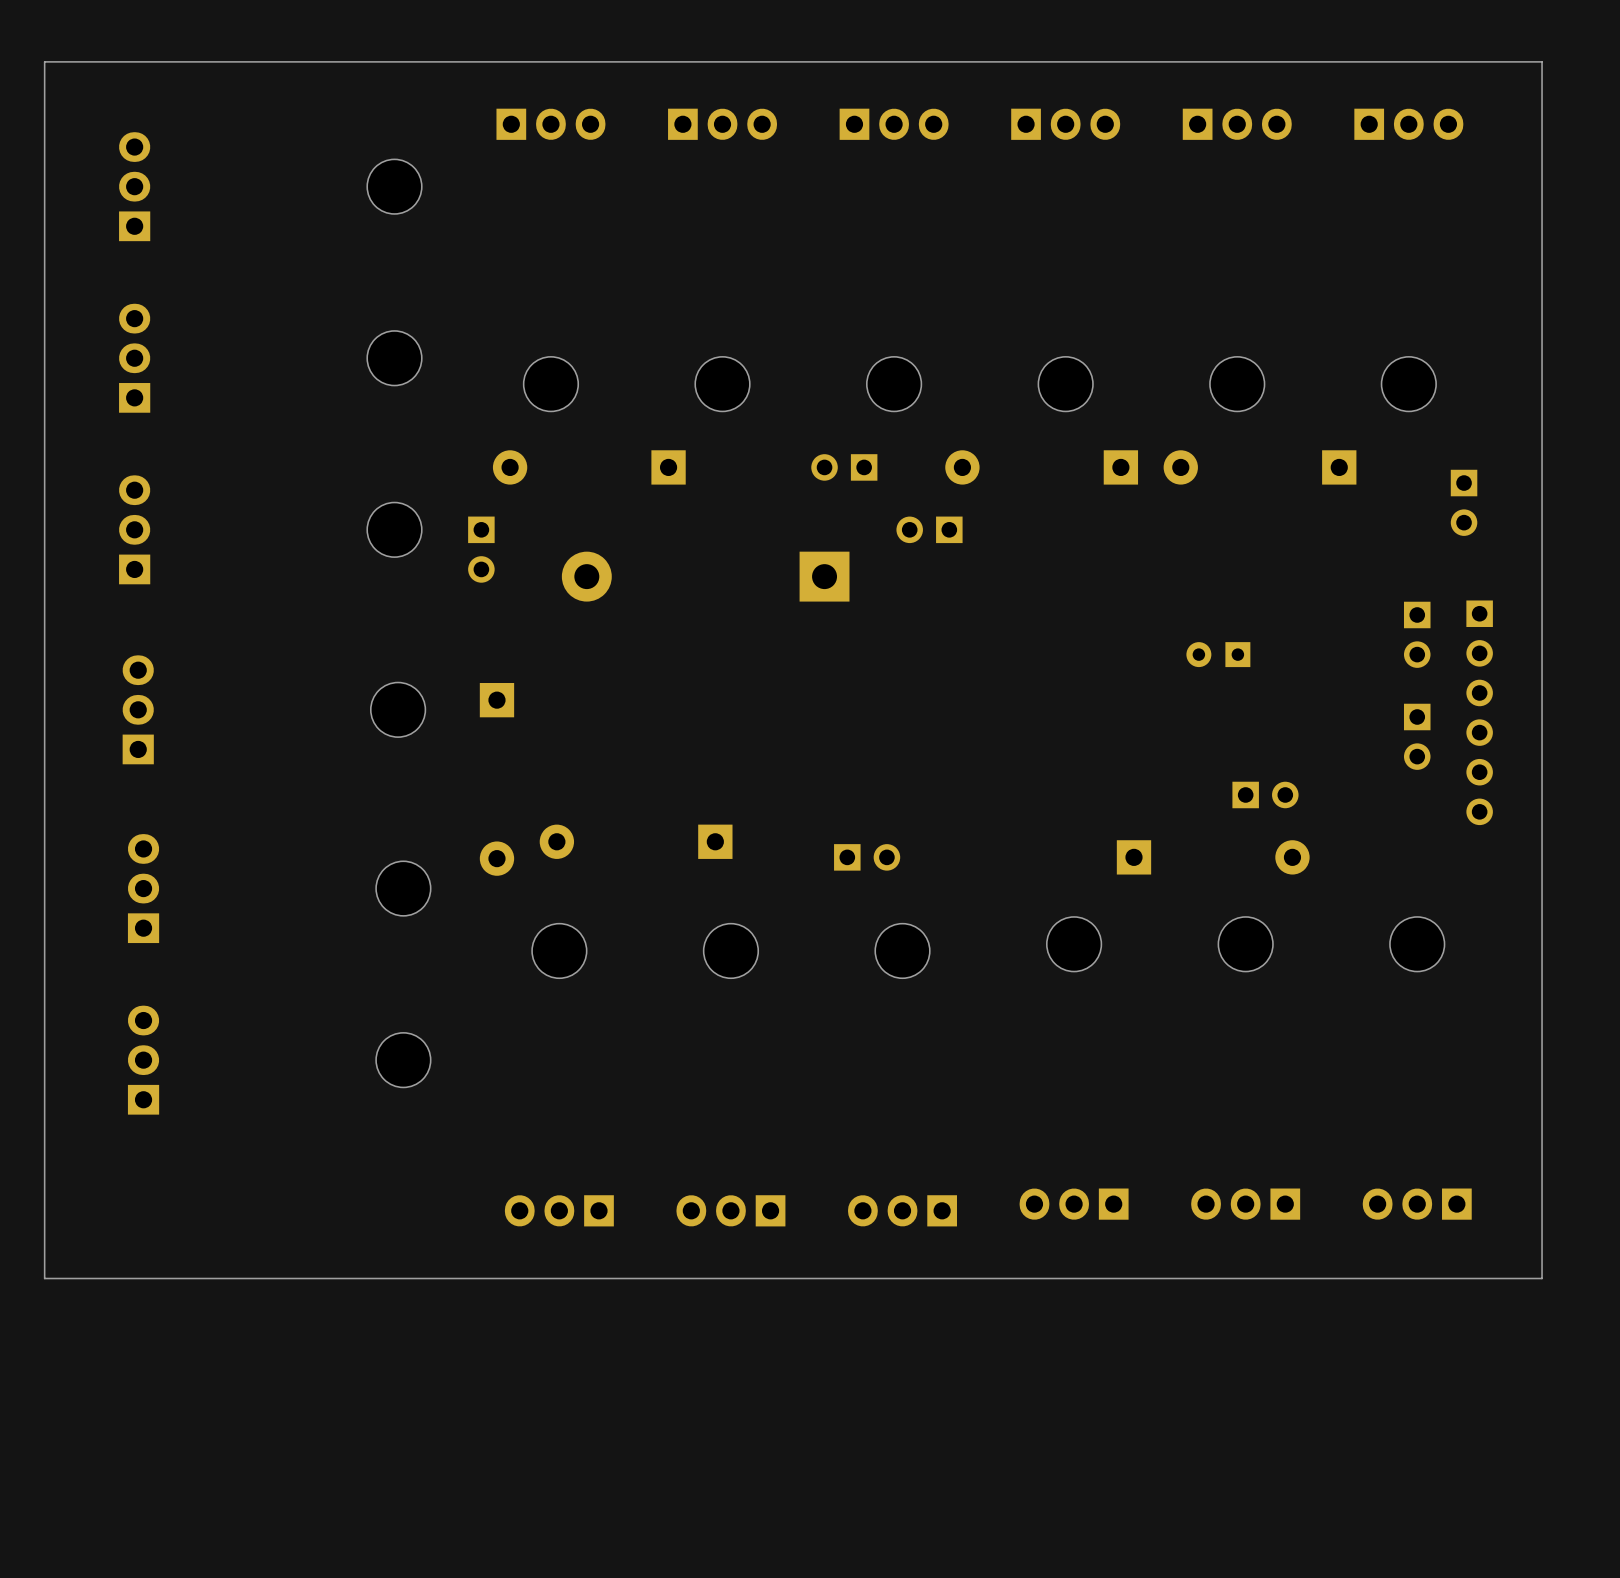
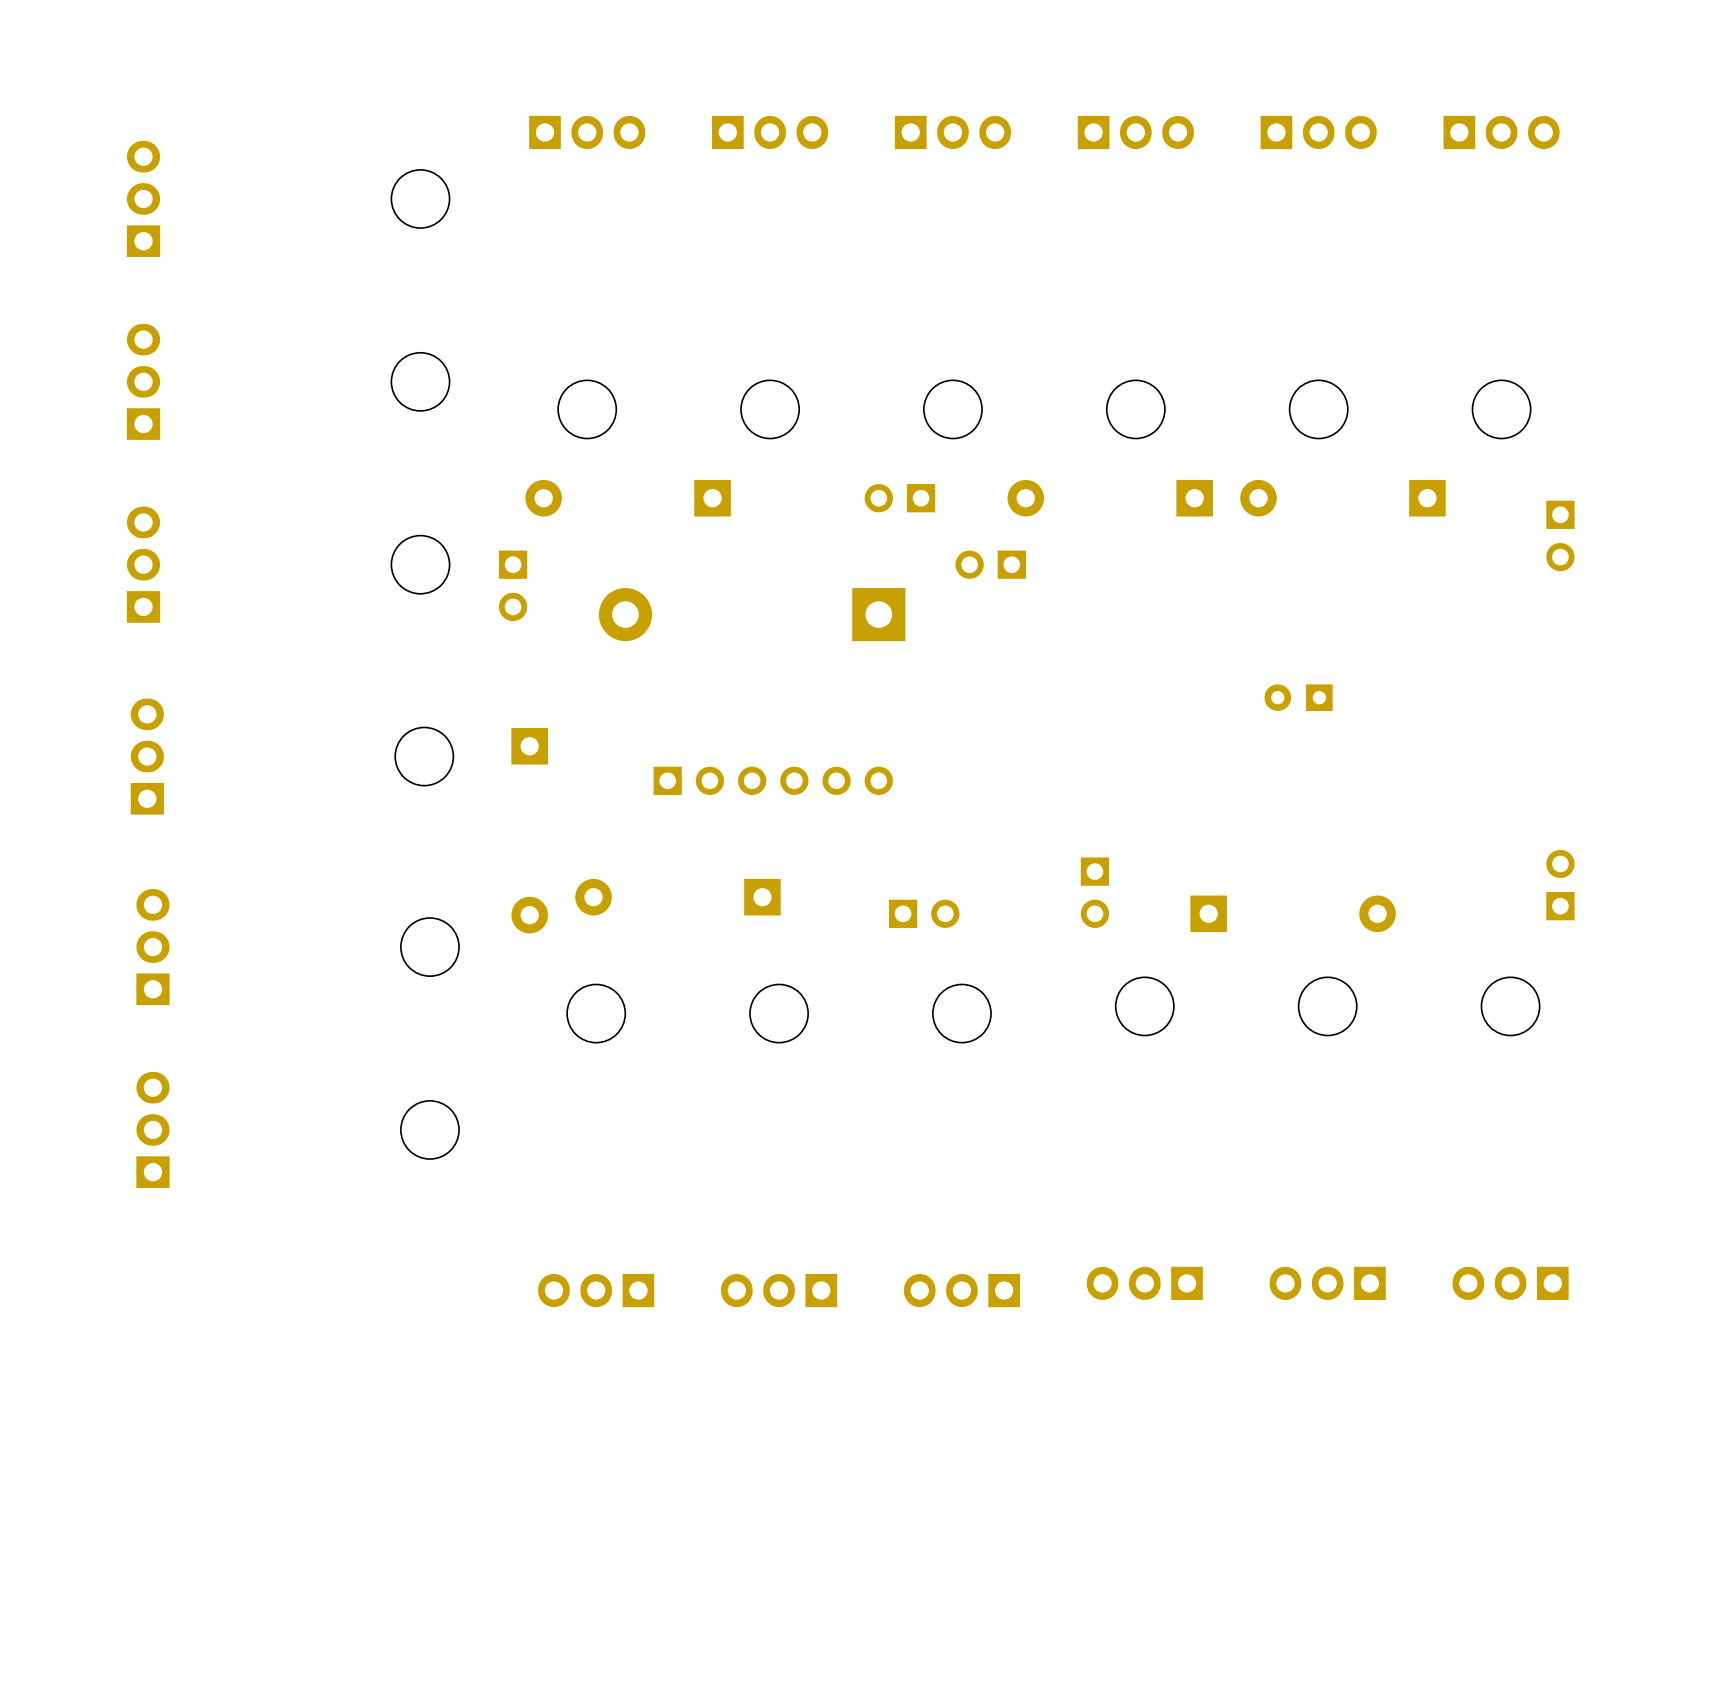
board edge: (1542, 61) (44, 61) (44, 1278) (1542, 1278) (1542, 61) -> none
part: (1417, 634) -> none
part: (1479, 712) -> none
part: none -> (773, 780)
part: (1417, 736) -> none
part: (1265, 794) -> none
part: none -> (1560, 885)
part: none -> (1094, 892)

